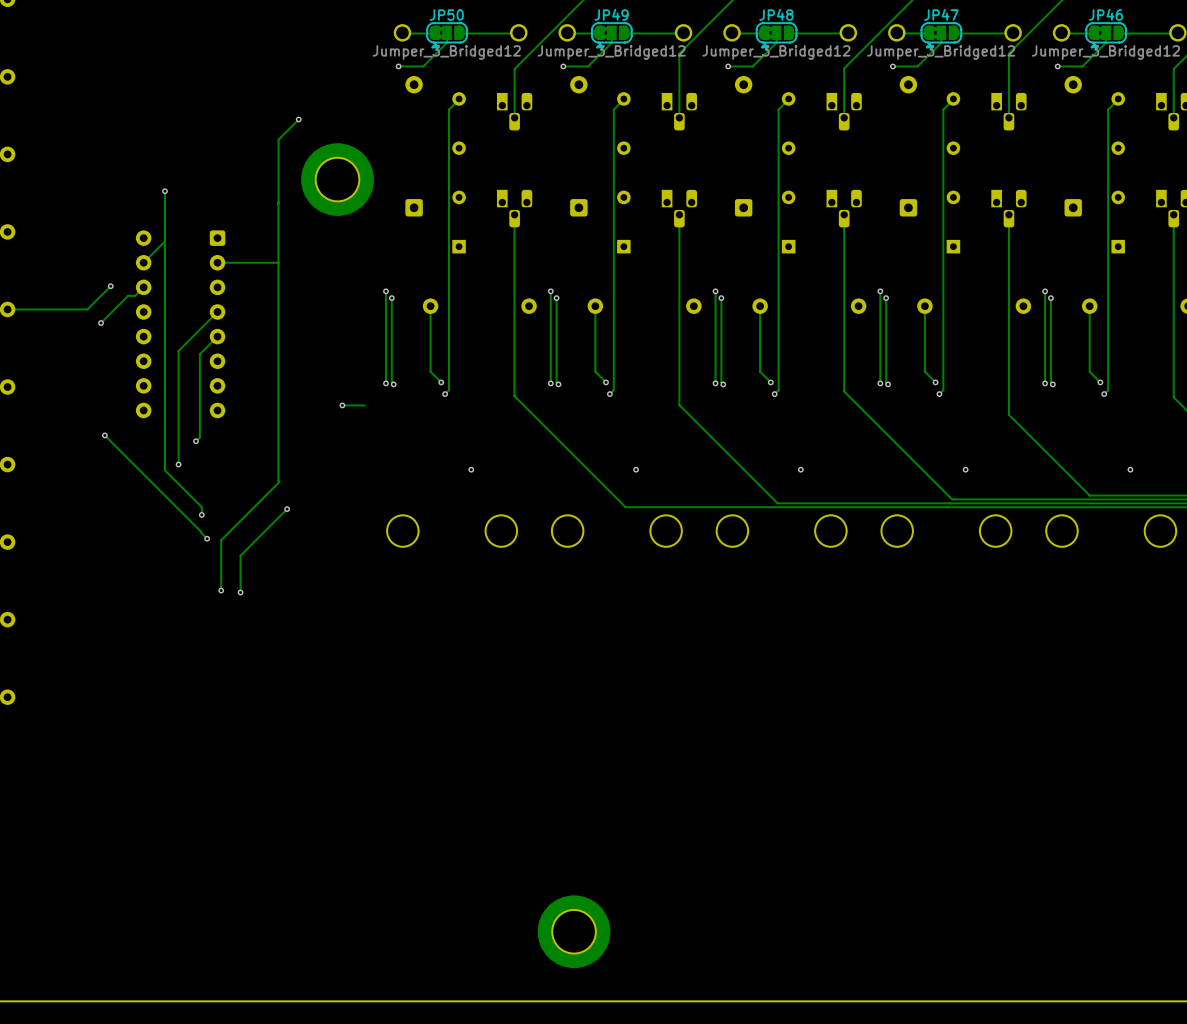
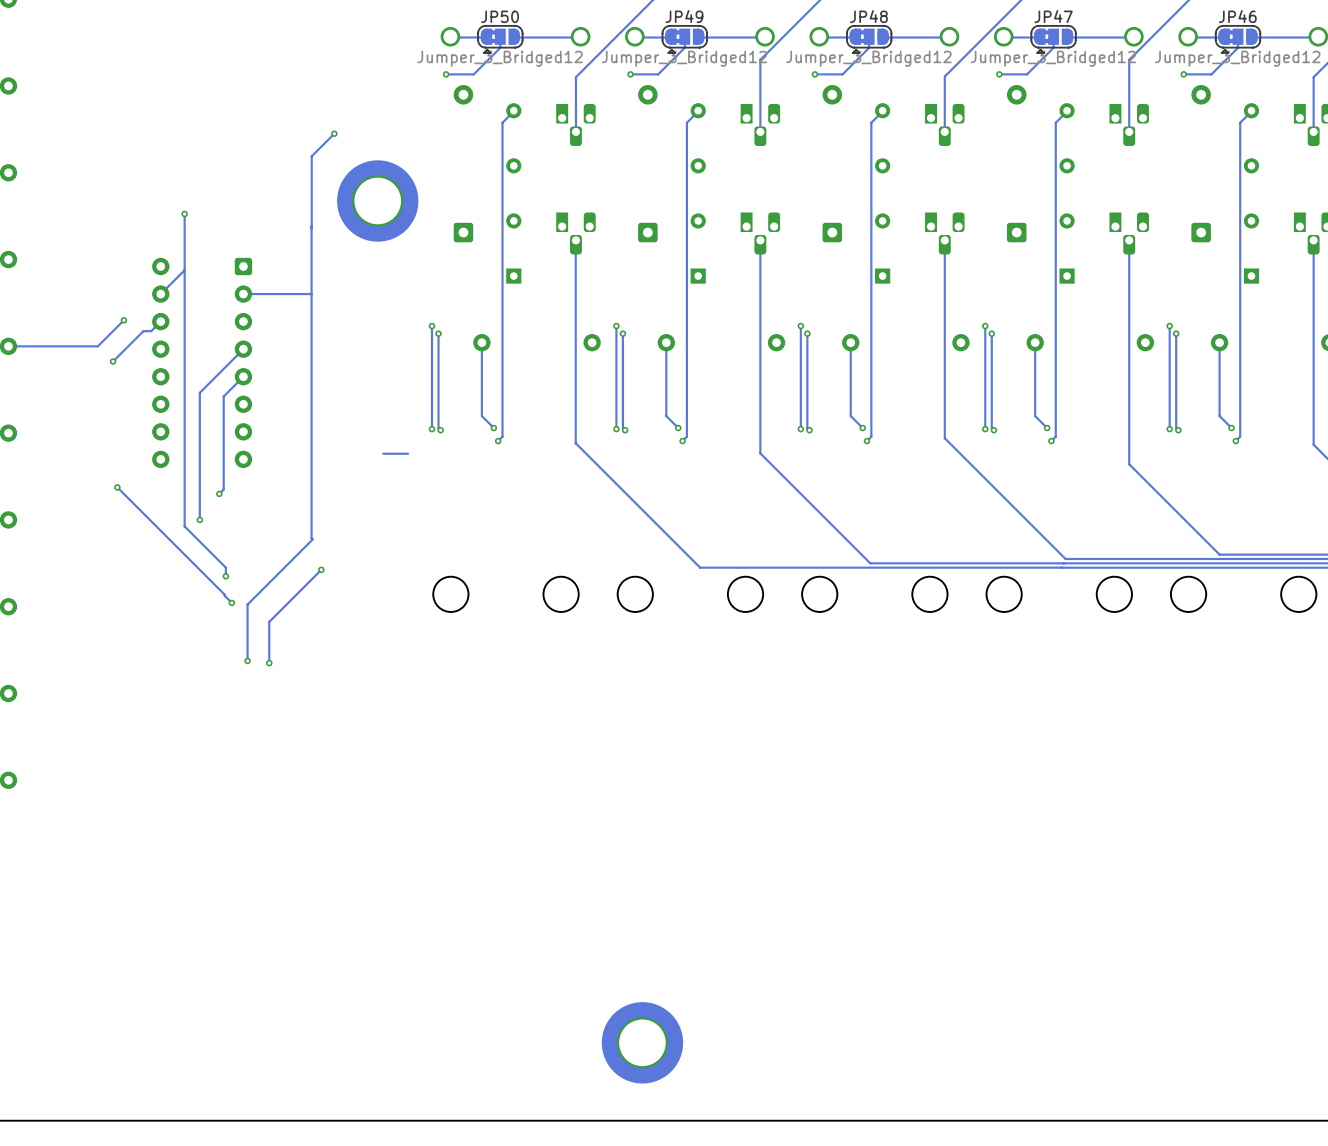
via: (342, 405) -> none
via: (471, 469) -> none
via: (636, 469) -> none
via: (800, 469) -> none
via: (965, 469) -> none
via: (1130, 469) -> none

